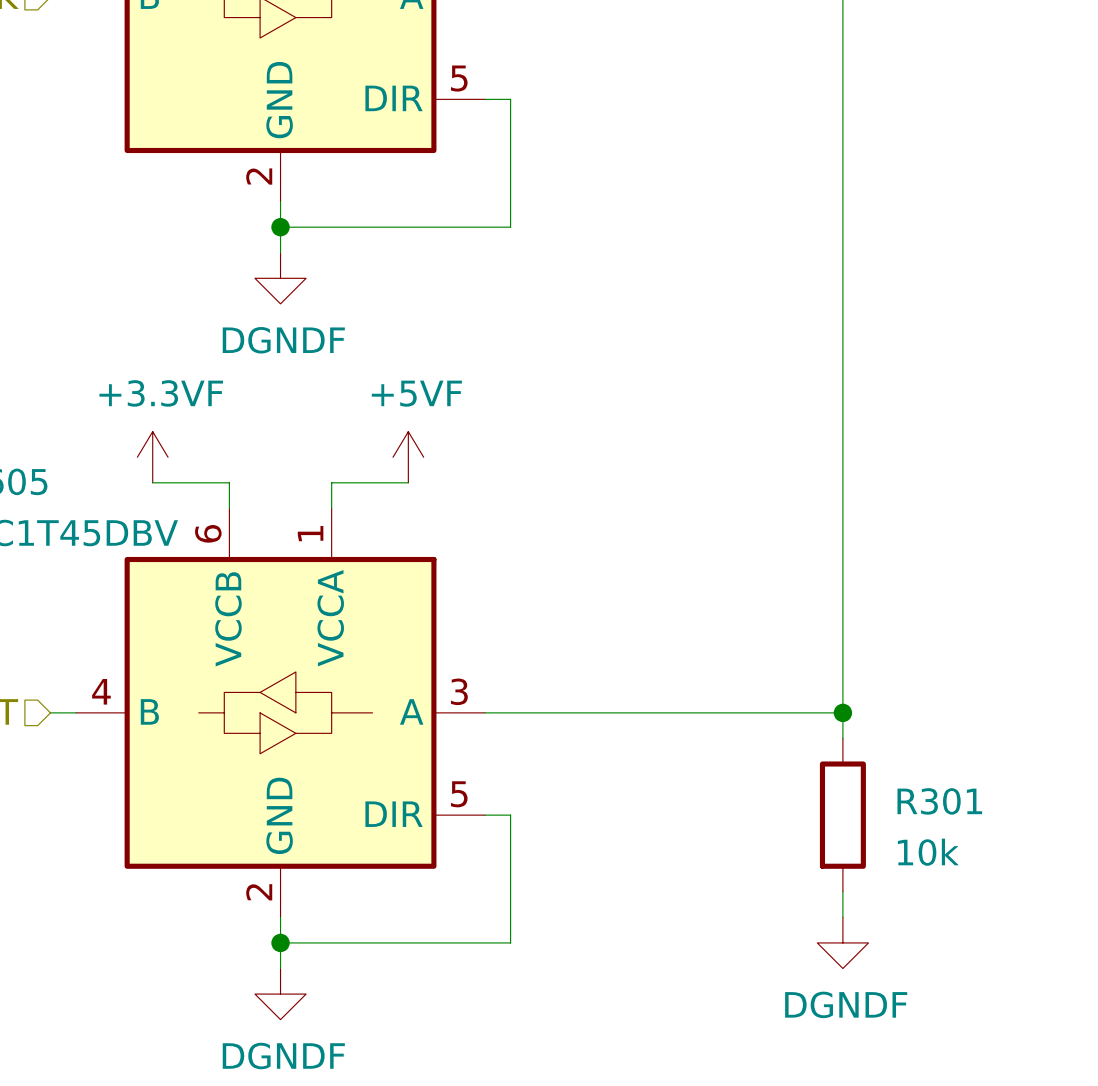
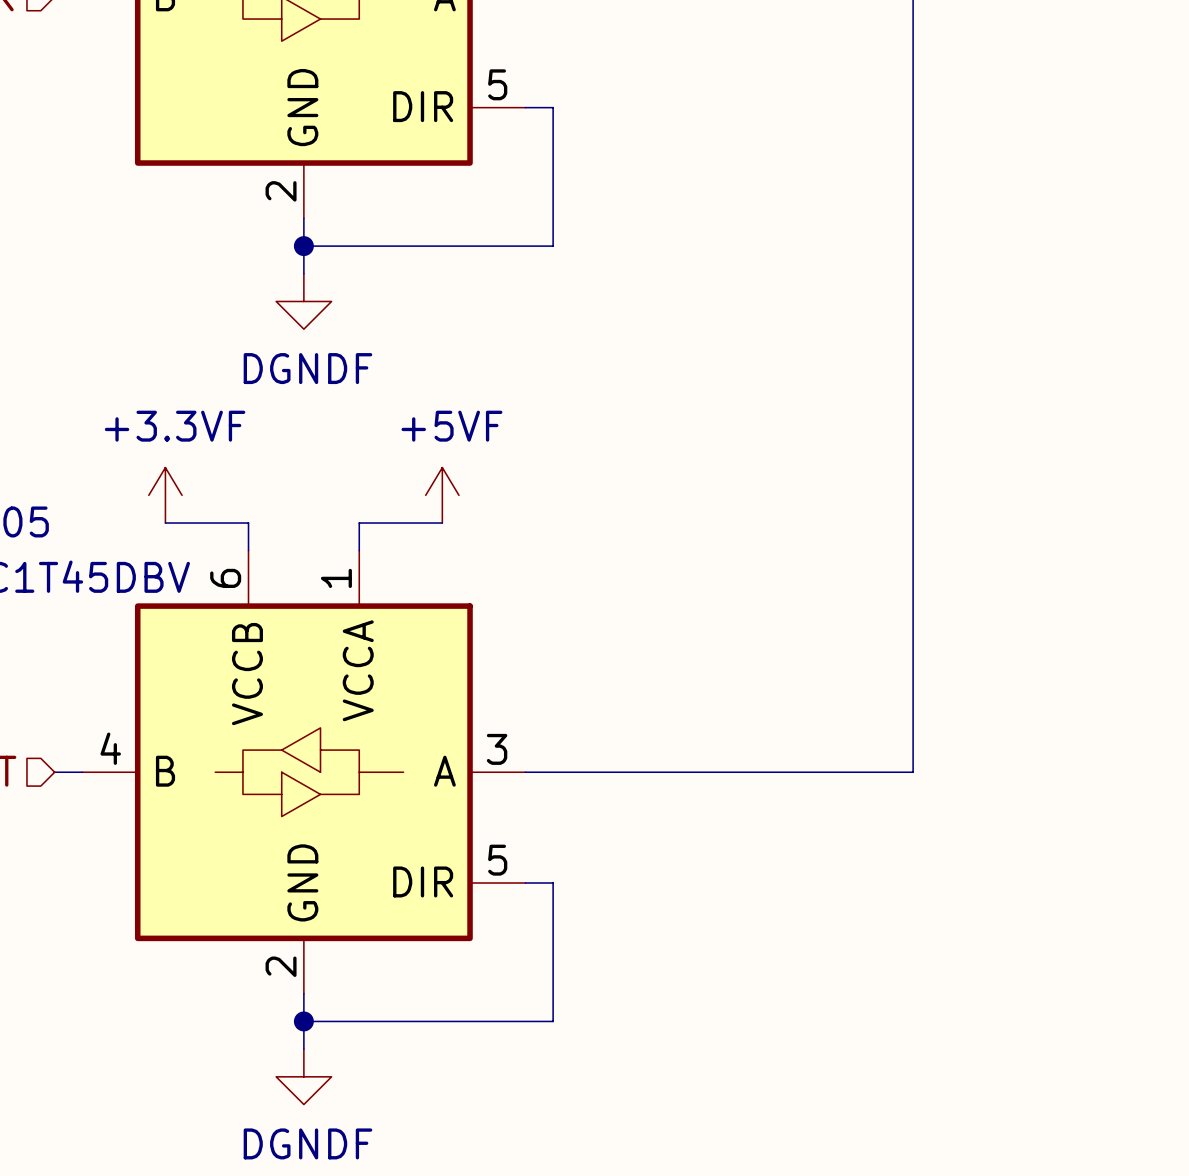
wire: (842, 712) (842, 738) -> none
junction: (842, 712) -> none
R301: 10k (842, 815) -> none
wire: (842, 891) (842, 917) -> none
power symbol: DGNDF (842, 942) -> none

